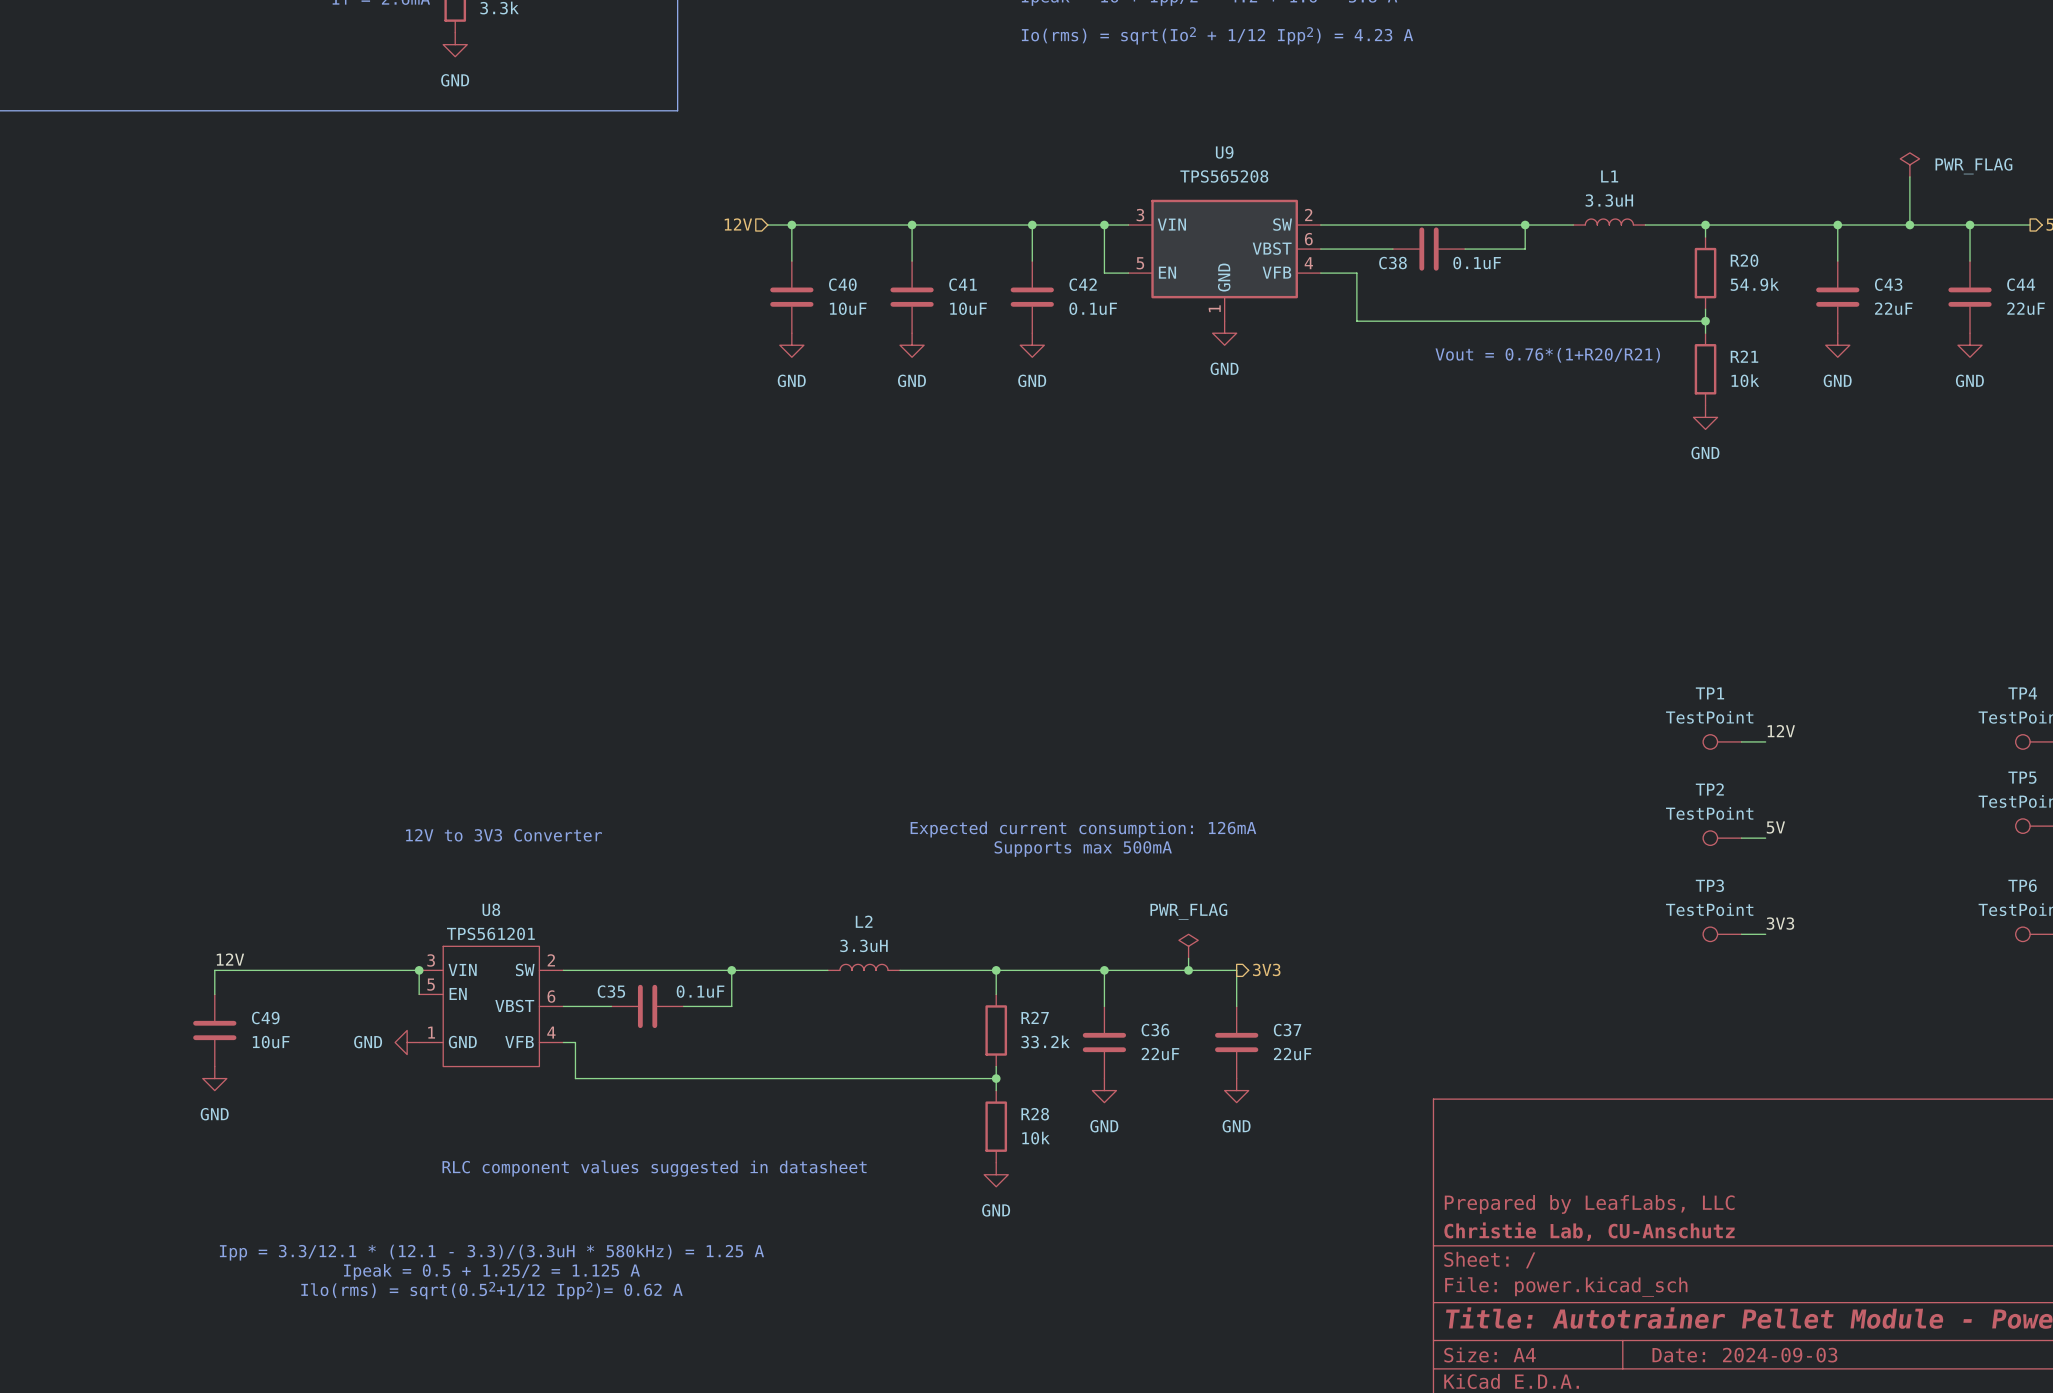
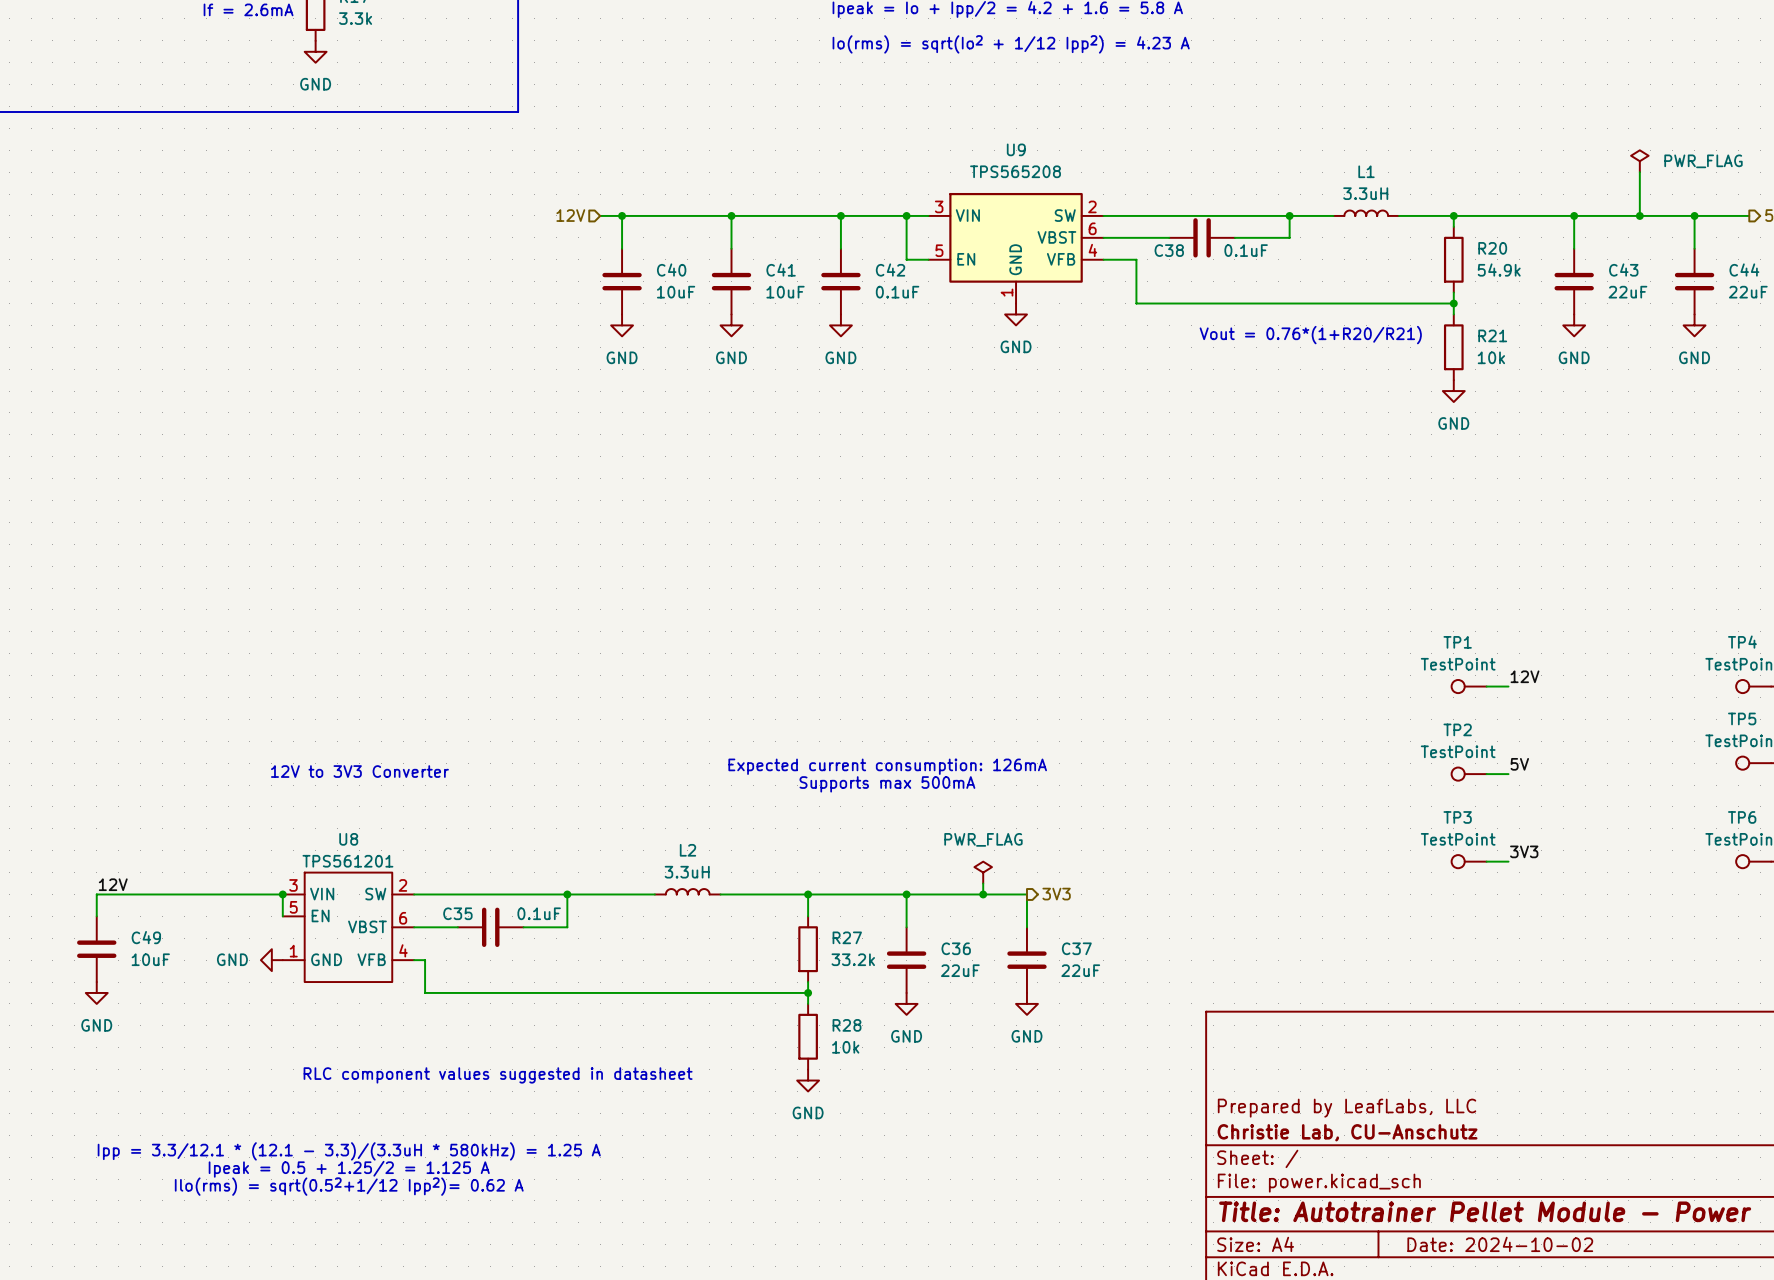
title block: Date: 2024-09-03 (1744, 1355) -> Date: 2024-10-02 (1500, 1244)

